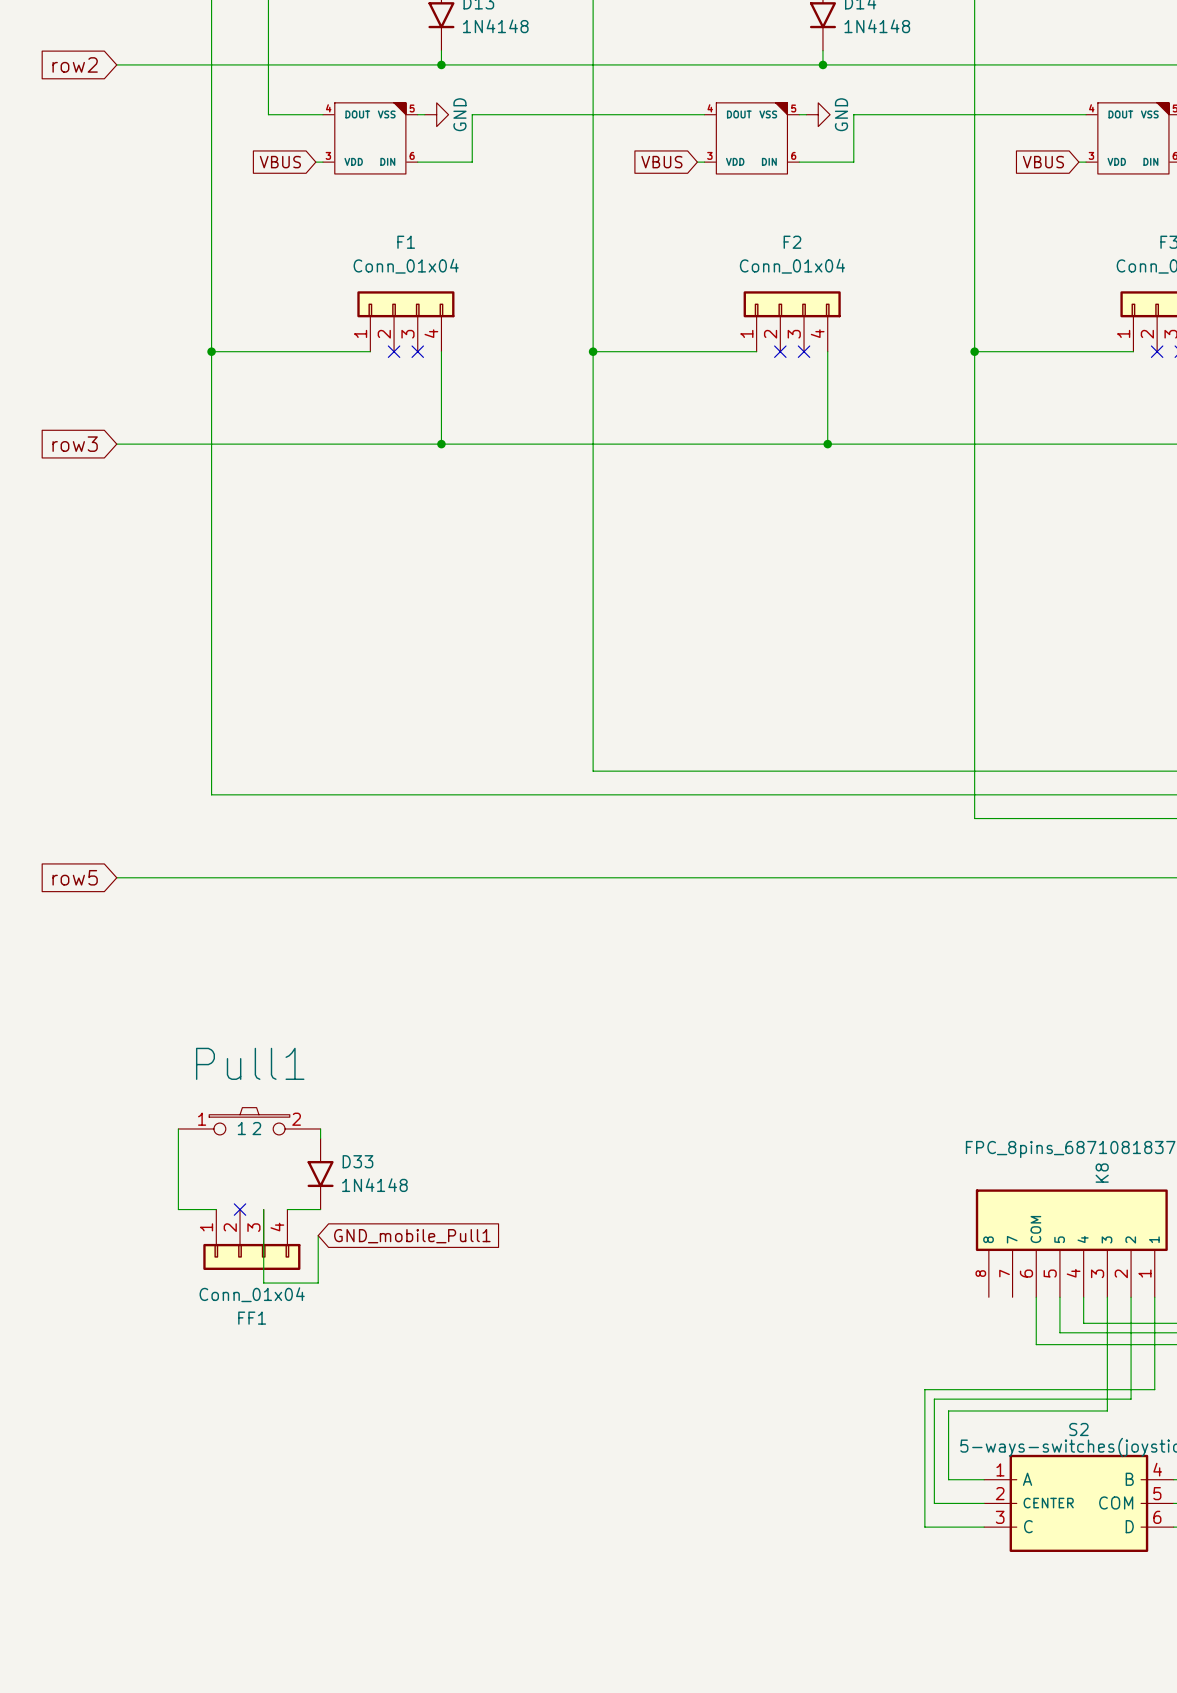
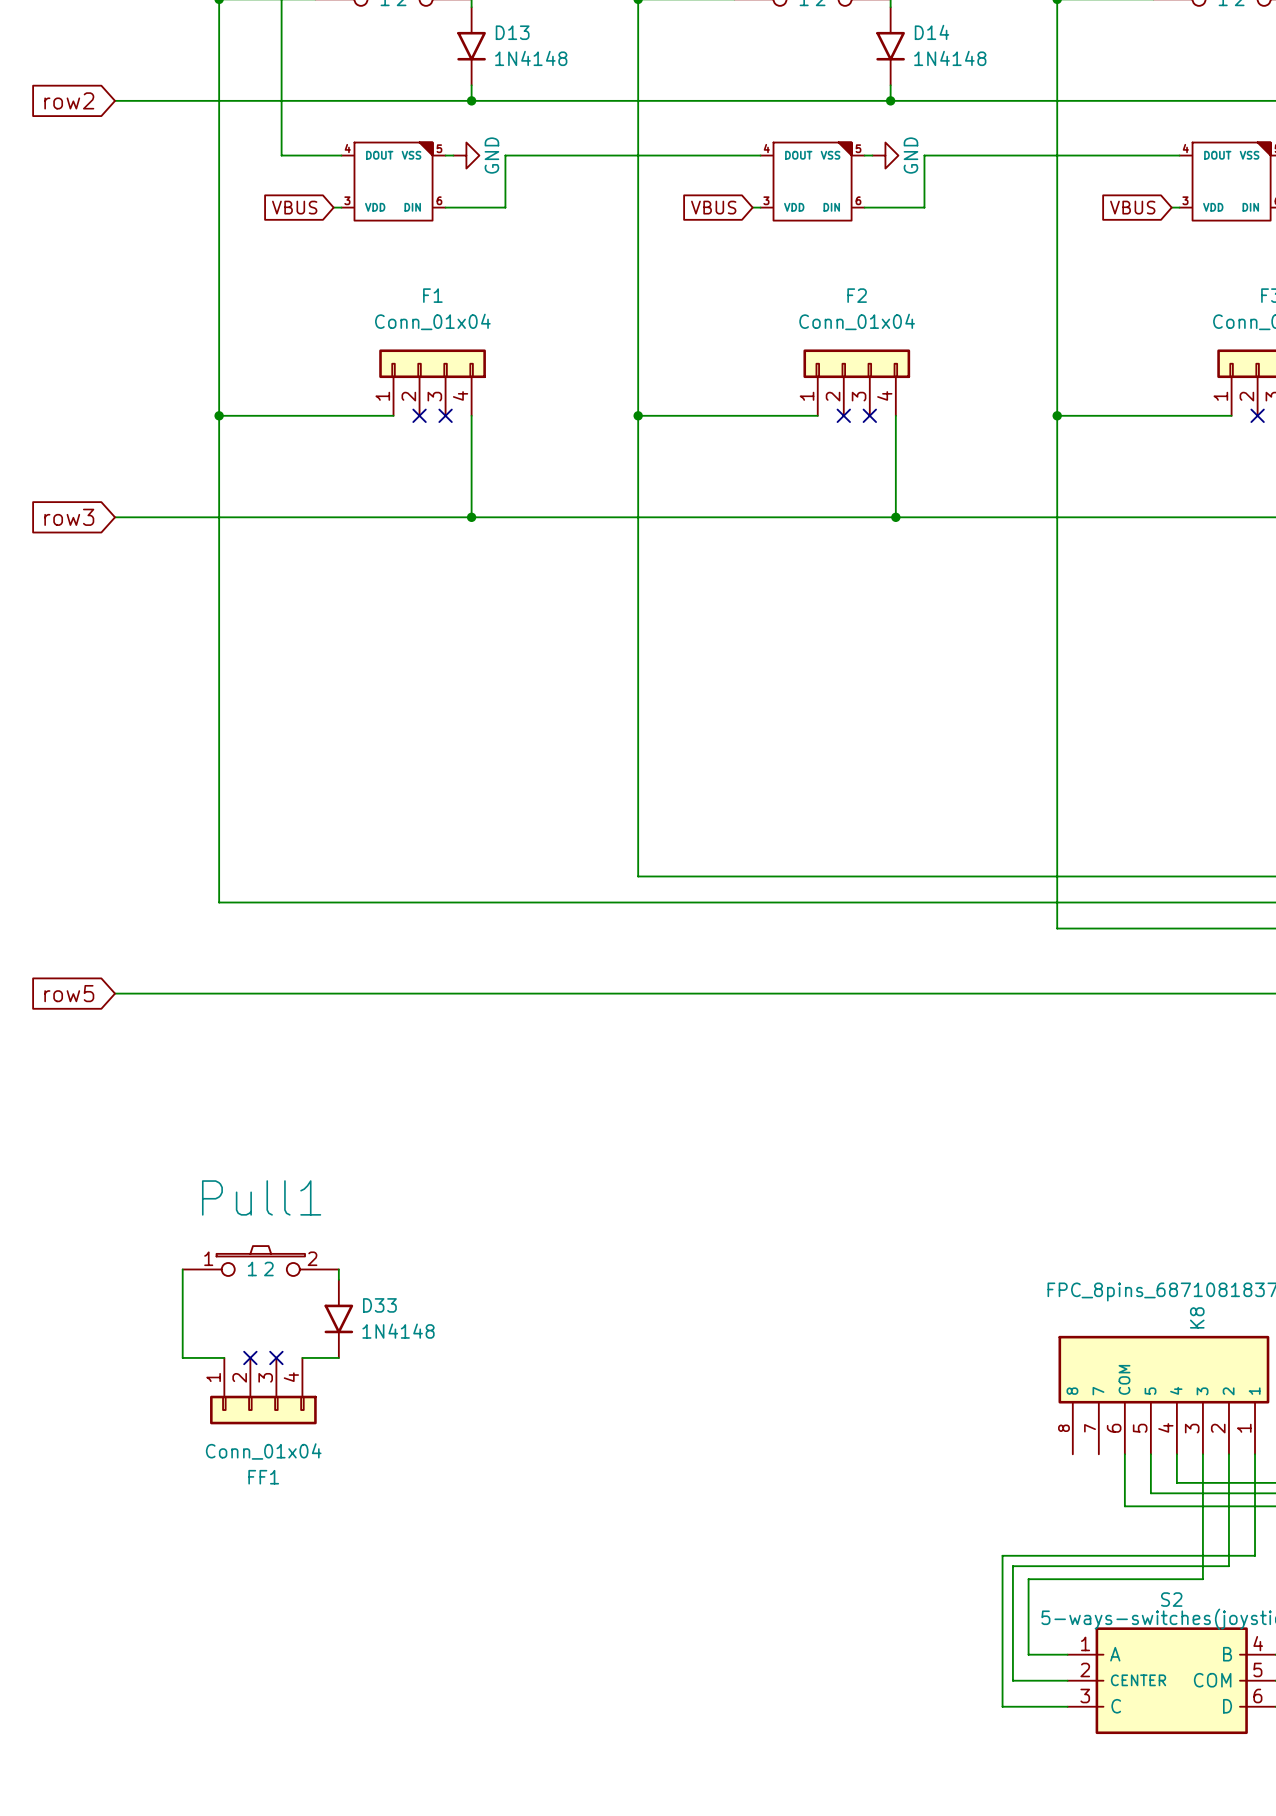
wire: (263, 1209) (263, 1283) (318, 1283) (318, 1235) -> none
no-connect mark: none -> (276, 1357)
global label: GND_mobile_Pull1 (412, 1236) -> none

